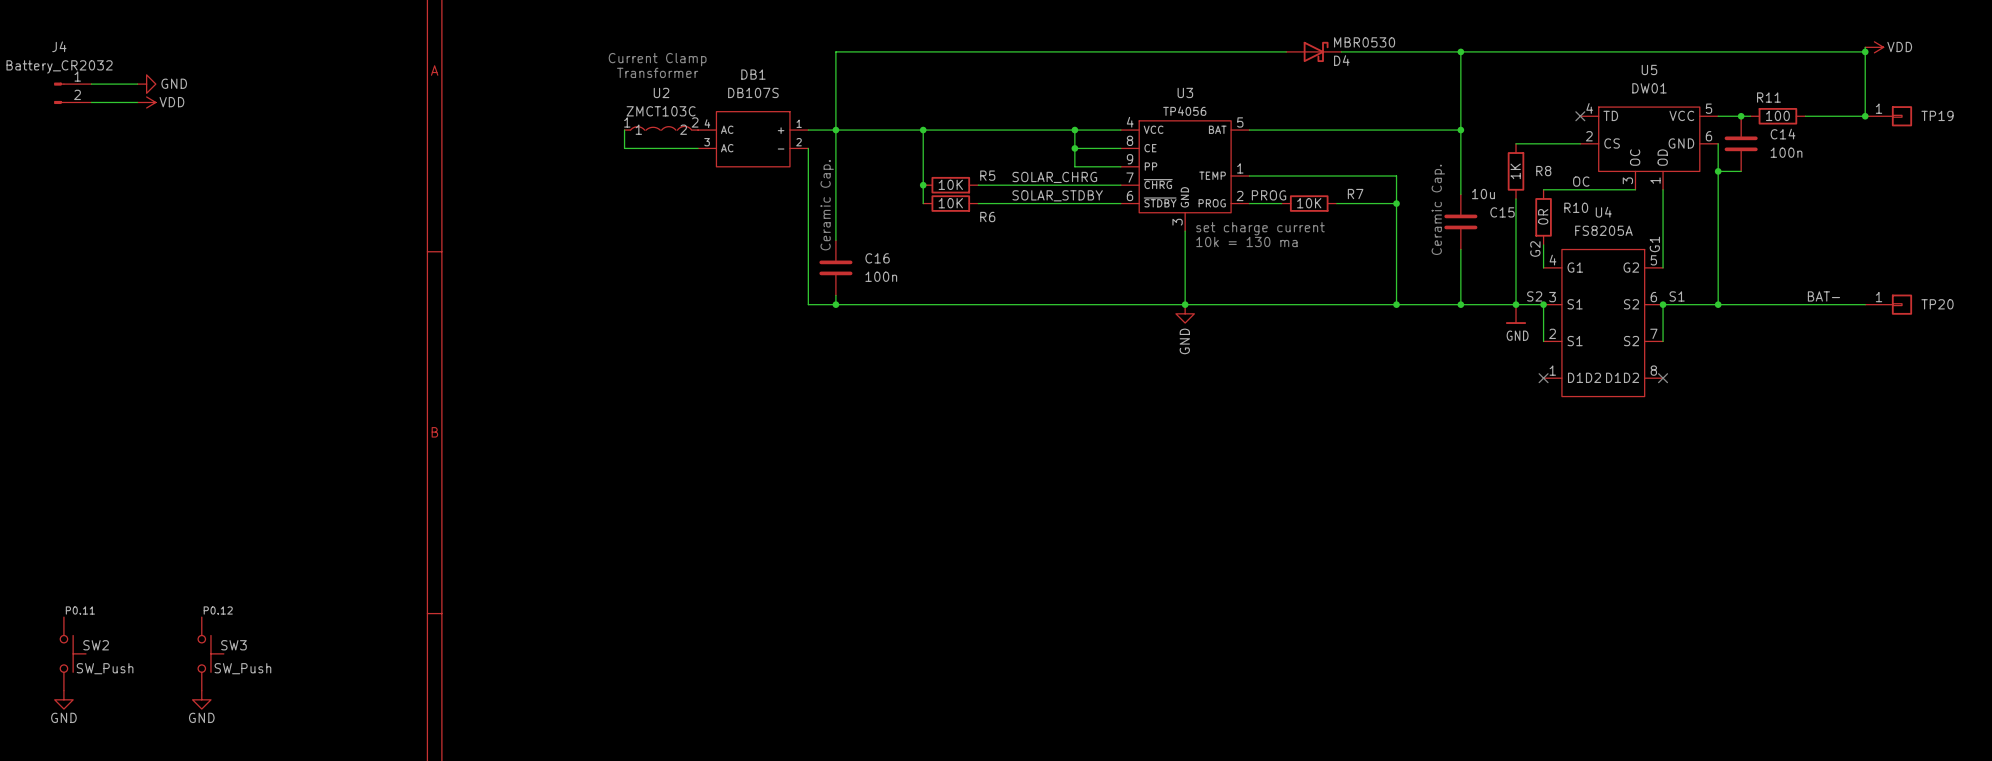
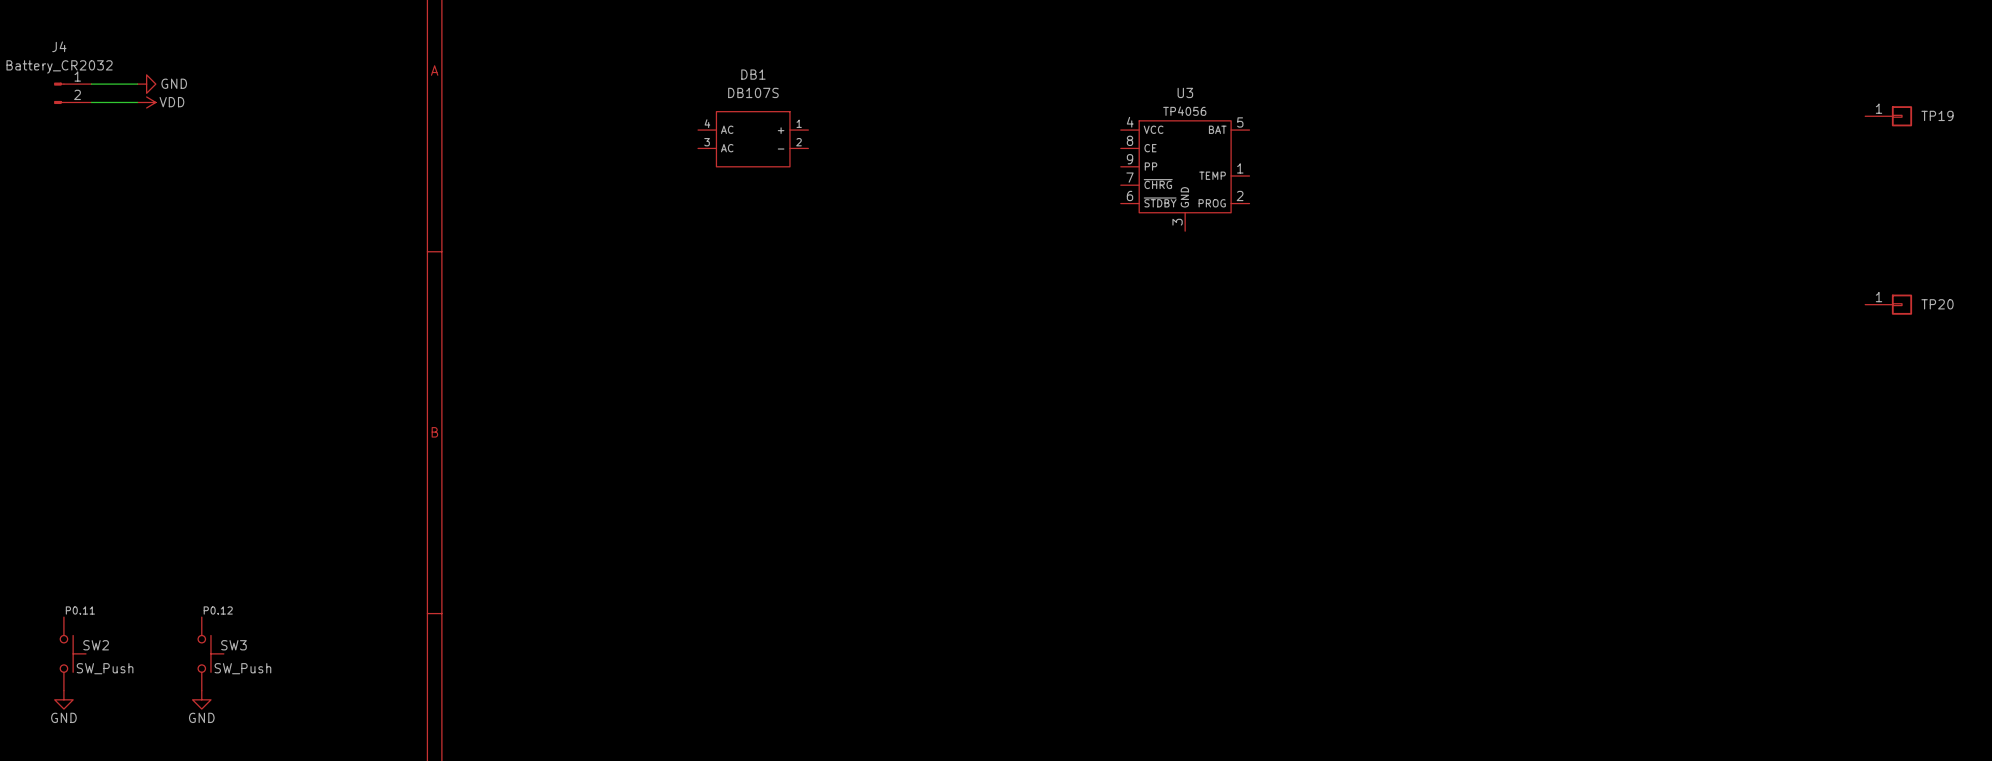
wire: (1865, 47) (1865, 116) (1805, 116) -> none
power symbol: VDD (1874, 47) -> none
wire: (1286, 51) (835, 51) (835, 240) -> none
D4: MBR0530 (1313, 51) -> none
wire: (1341, 51) (1865, 51) -> none
wire: (1460, 51) (1460, 194) -> none
junction: (1460, 51) -> none
junction: (1865, 51) -> none
text: Current Clamp (657, 59) -> none
text: Transformer (657, 72) -> none
no-connect mark: (1580, 116) -> none
wire: (1718, 116) (1750, 116) -> none
junction: (1741, 116) -> none
R11: 100 (1777, 116) -> none
junction: (1865, 116) -> none
U2: ZMCT103C (661, 128) -> none
wire: (624, 130) (624, 148) (698, 148) -> none
wire: (808, 130) (1120, 130) -> none
junction: (835, 130) -> none
wire: (923, 130) (923, 203) -> none
junction: (923, 130) -> none
wire: (1074, 130) (1074, 166) (1120, 166) -> none
junction: (1074, 130) -> none
wire: (1249, 130) (1460, 130) -> none
junction: (1460, 130) -> none
wire: (1516, 143) (1580, 143) -> none
wire: (1718, 143) (1718, 304) -> none
C14: 100n (1741, 143) -> none
wire: (808, 148) (808, 304) (1543, 304) (1543, 341) -> none
wire: (1074, 148) (1120, 148) -> none
junction: (1074, 148) -> none
U5: DW01 (1649, 148) -> none
R8: 1K (1516, 171) -> none
wire: (1718, 171) (1741, 171) -> none
junction: (1718, 171) -> none
wire: (1249, 176) (1396, 176) (1396, 304) -> none
label: SOLAR_CHRG (1054, 177) -> none
label: OC (1581, 181) -> none
junction: (923, 185) -> none
R5: 10K (950, 185) -> none
wire: (978, 185) (1120, 185) -> none
wire: (1543, 189) (1635, 189) -> none
wire: (1663, 189) (1663, 267) -> none
label: SOLAR_STDBY (1057, 195) -> none
label: PROG (1269, 195) -> none
wire: (1516, 198) (1516, 304) -> none
R6: 10K (950, 203) -> none
wire: (978, 203) (1120, 203) -> none
wire: (1249, 203) (1281, 203) -> none
R7: 10K (1309, 203) -> none
wire: (1336, 203) (1396, 203) -> none
junction: (1396, 203) -> none
text: Ceramic Cap. (827, 205) -> none
text: Ceramic Cap. (1438, 209) -> none
R10: 0R (1543, 217) -> none
C15: 10u (1460, 221) -> none
text: set charge current (1260, 228) -> none
wire: (1185, 231) (1185, 304) -> none
text: 10k = 130 ma (1246, 241) -> none
wire: (1543, 244) (1543, 267) -> none
label: G1 (1654, 244) -> none
wire: (1460, 249) (1460, 304) -> none
label: G2 (1535, 249) -> none
C16: 100n (835, 267) -> none
wire: (835, 295) (835, 304) -> none
label: S2 (1534, 296) -> none
label: S1 (1677, 296) -> none
label: BAT- (1823, 296) -> none
junction: (835, 304) -> none
junction: (1185, 304) -> none
junction: (1396, 304) -> none
junction: (1460, 304) -> none
junction: (1516, 304) -> none
junction: (1543, 304) -> none
junction: (1663, 304) -> none
junction: (1718, 304) -> none
wire: (1865, 304) (1663, 304) (1663, 341) -> none
power symbol: GND (1185, 313) -> none
power symbol: GND (1516, 314) -> none
U4: FS8205A (1603, 323) -> none
no-connect mark: (1543, 378) -> none
no-connect mark: (1663, 378) -> none

